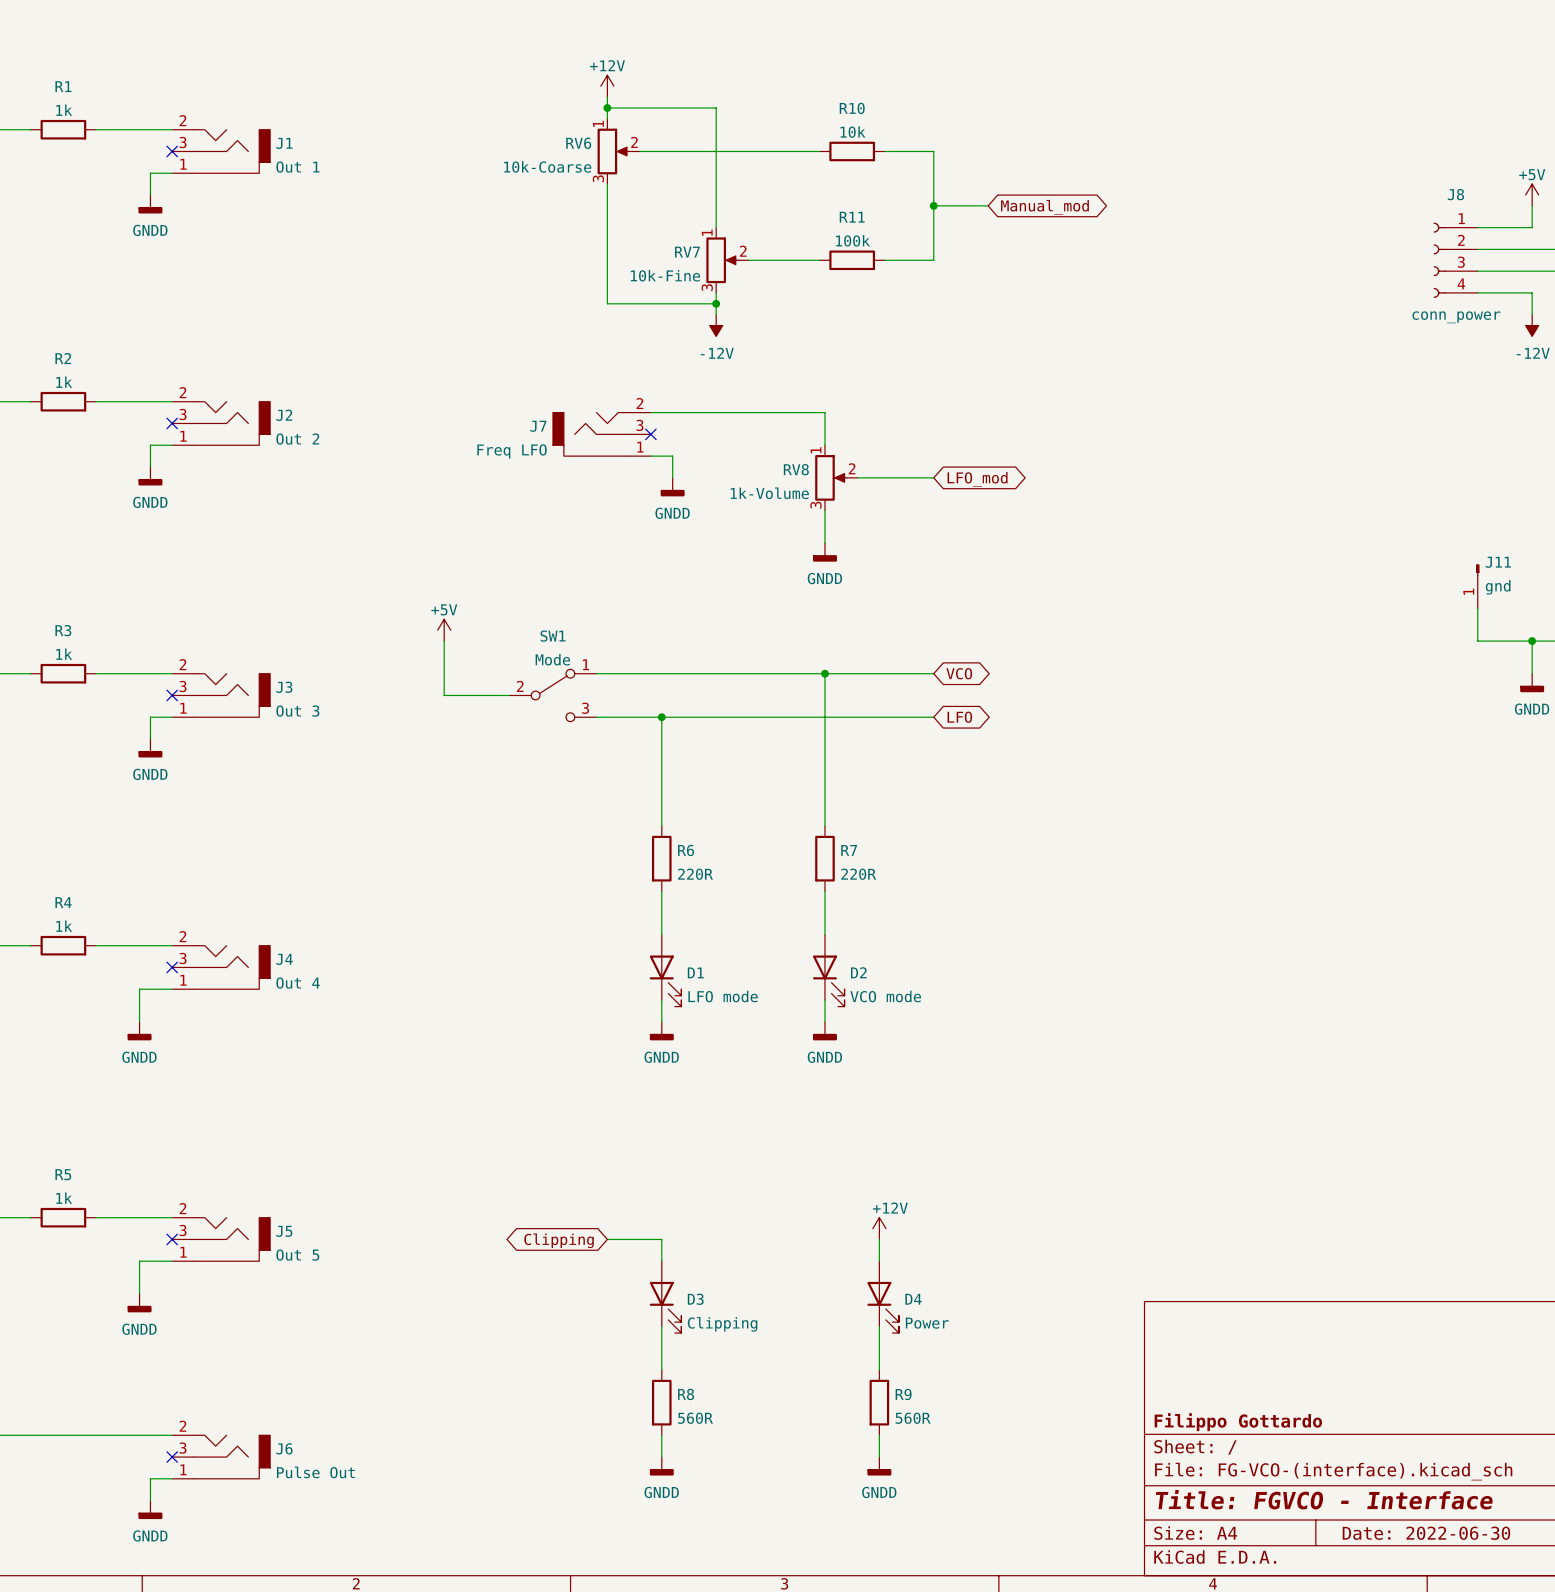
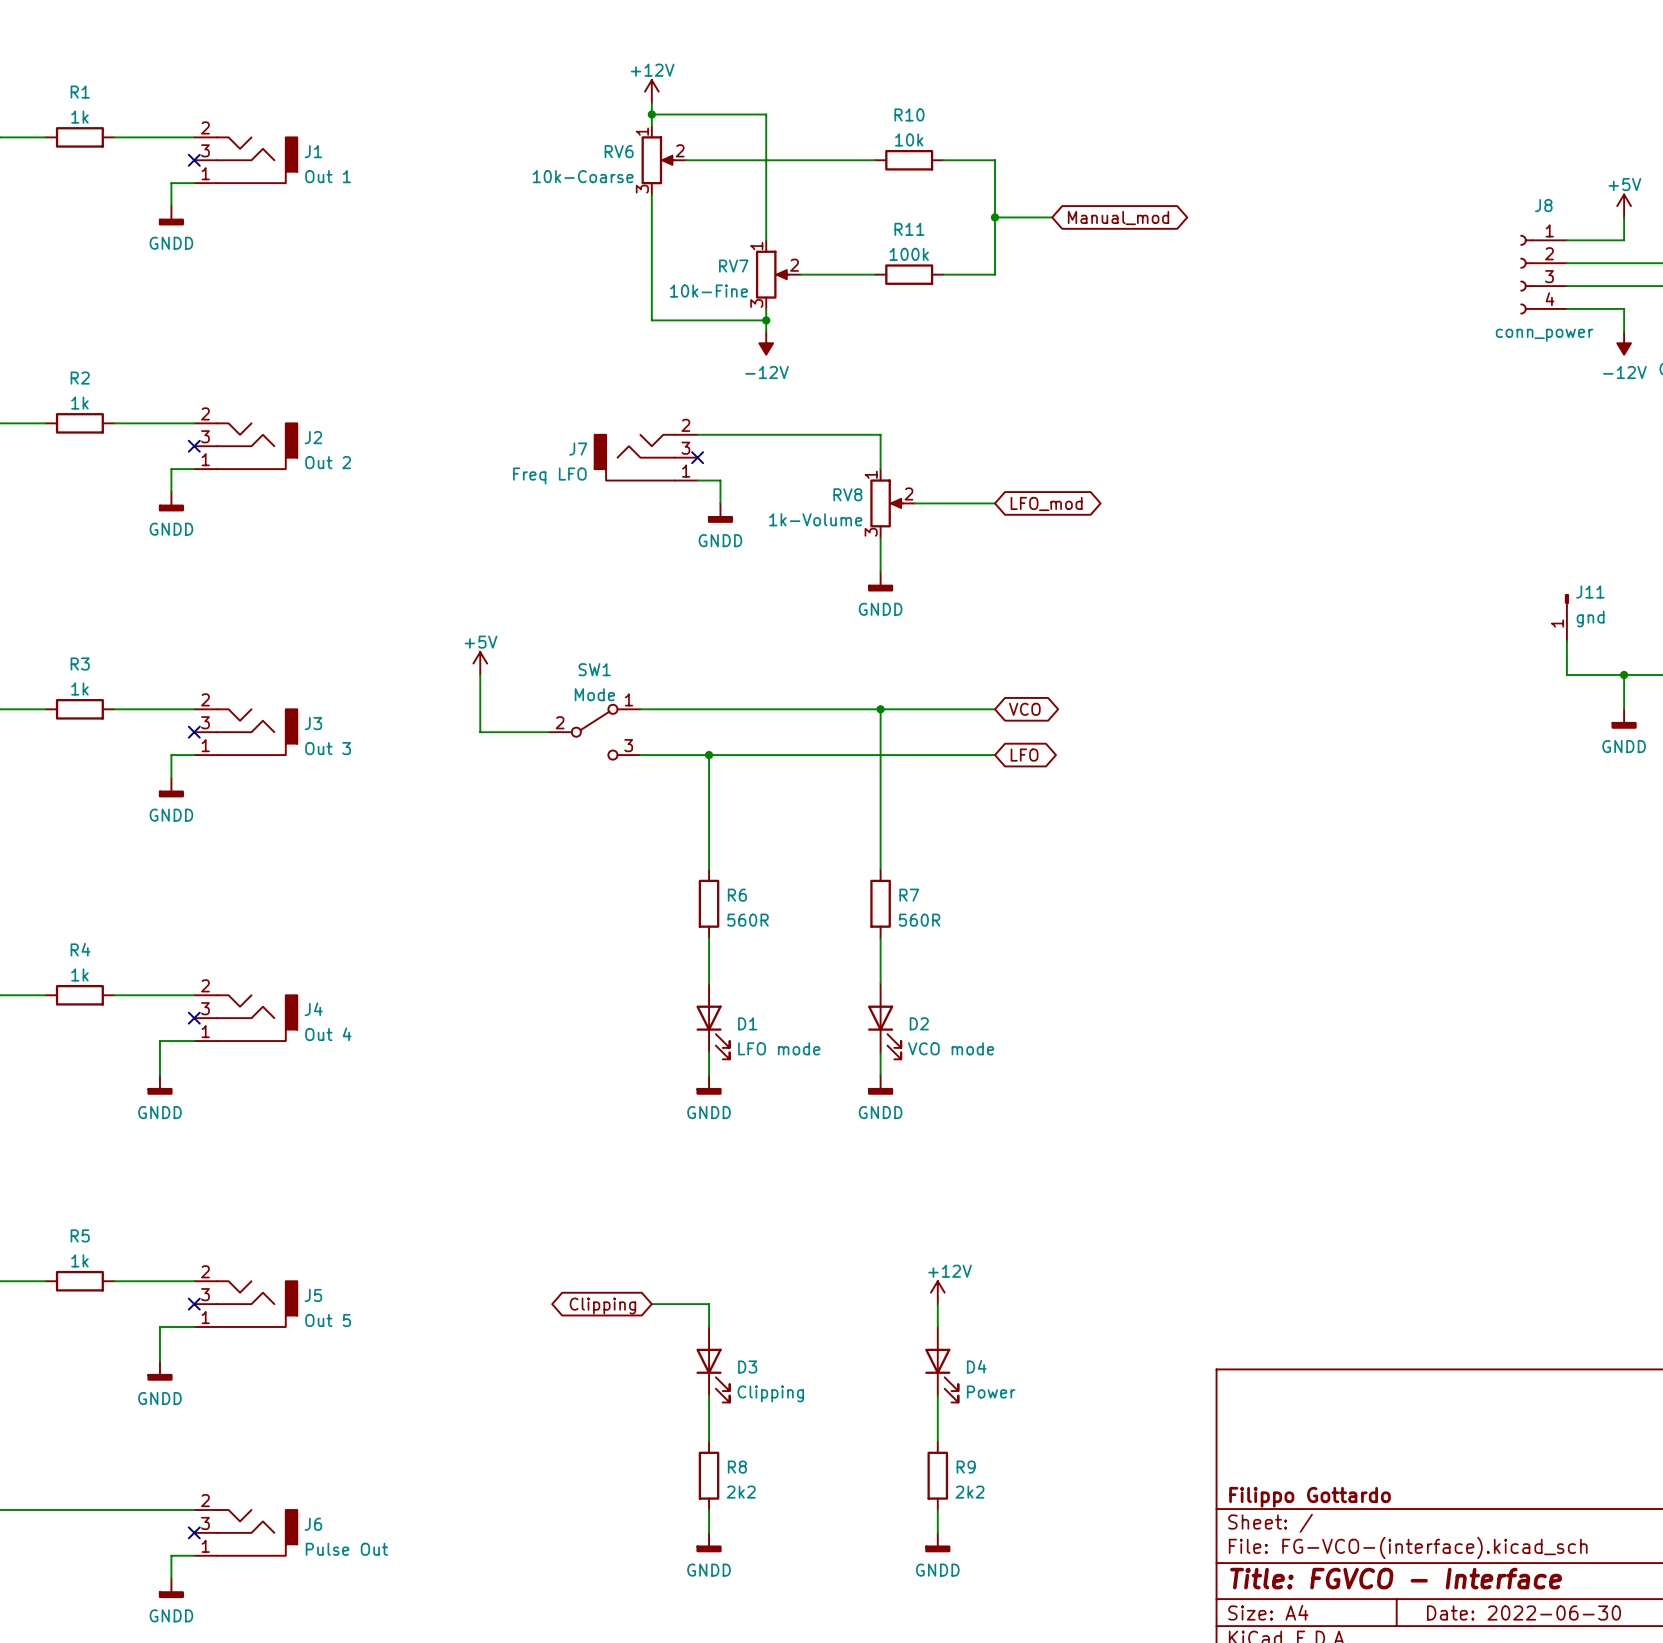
R6 value: 220R (695, 874) -> 560R (748, 920)
R7 value: 220R (858, 874) -> 560R (919, 920)
R8 value: 560R (695, 1418) -> 2k2 (741, 1492)
R9 value: 560R (913, 1418) -> 2k2 (969, 1492)

